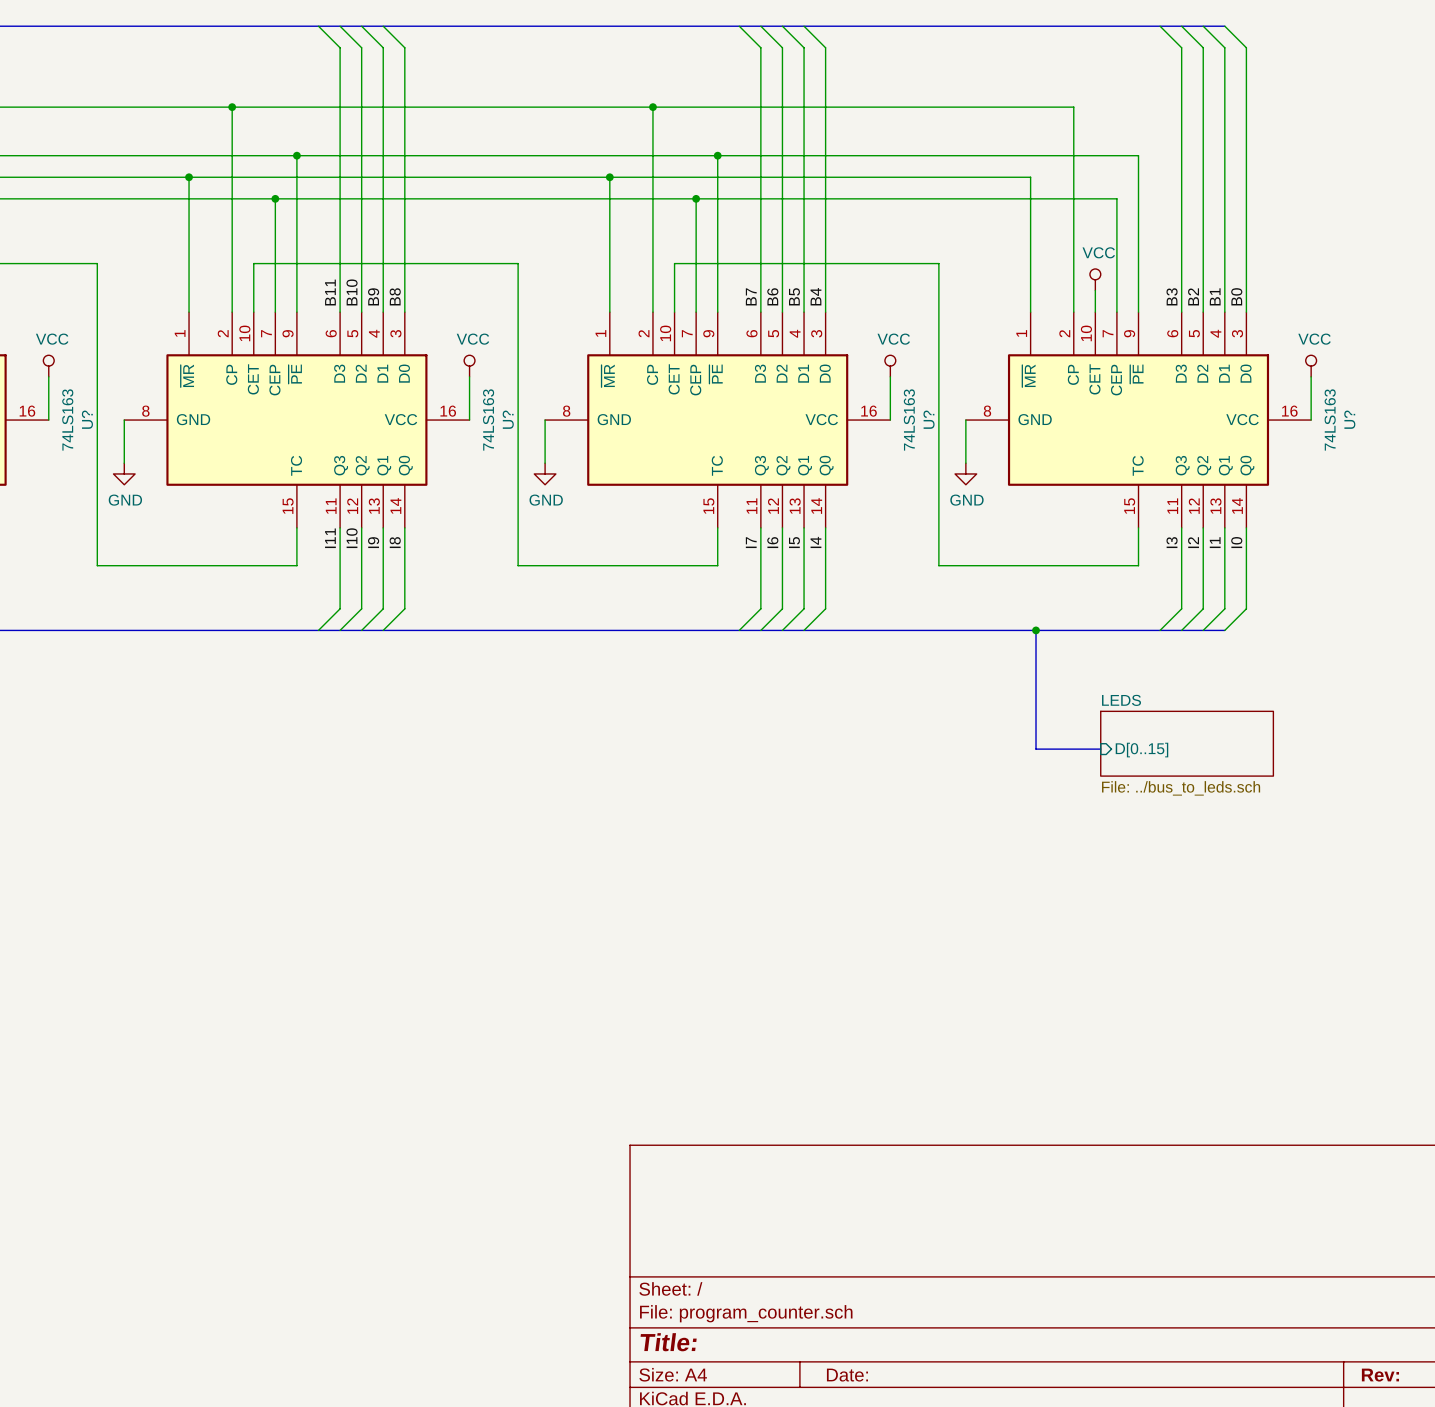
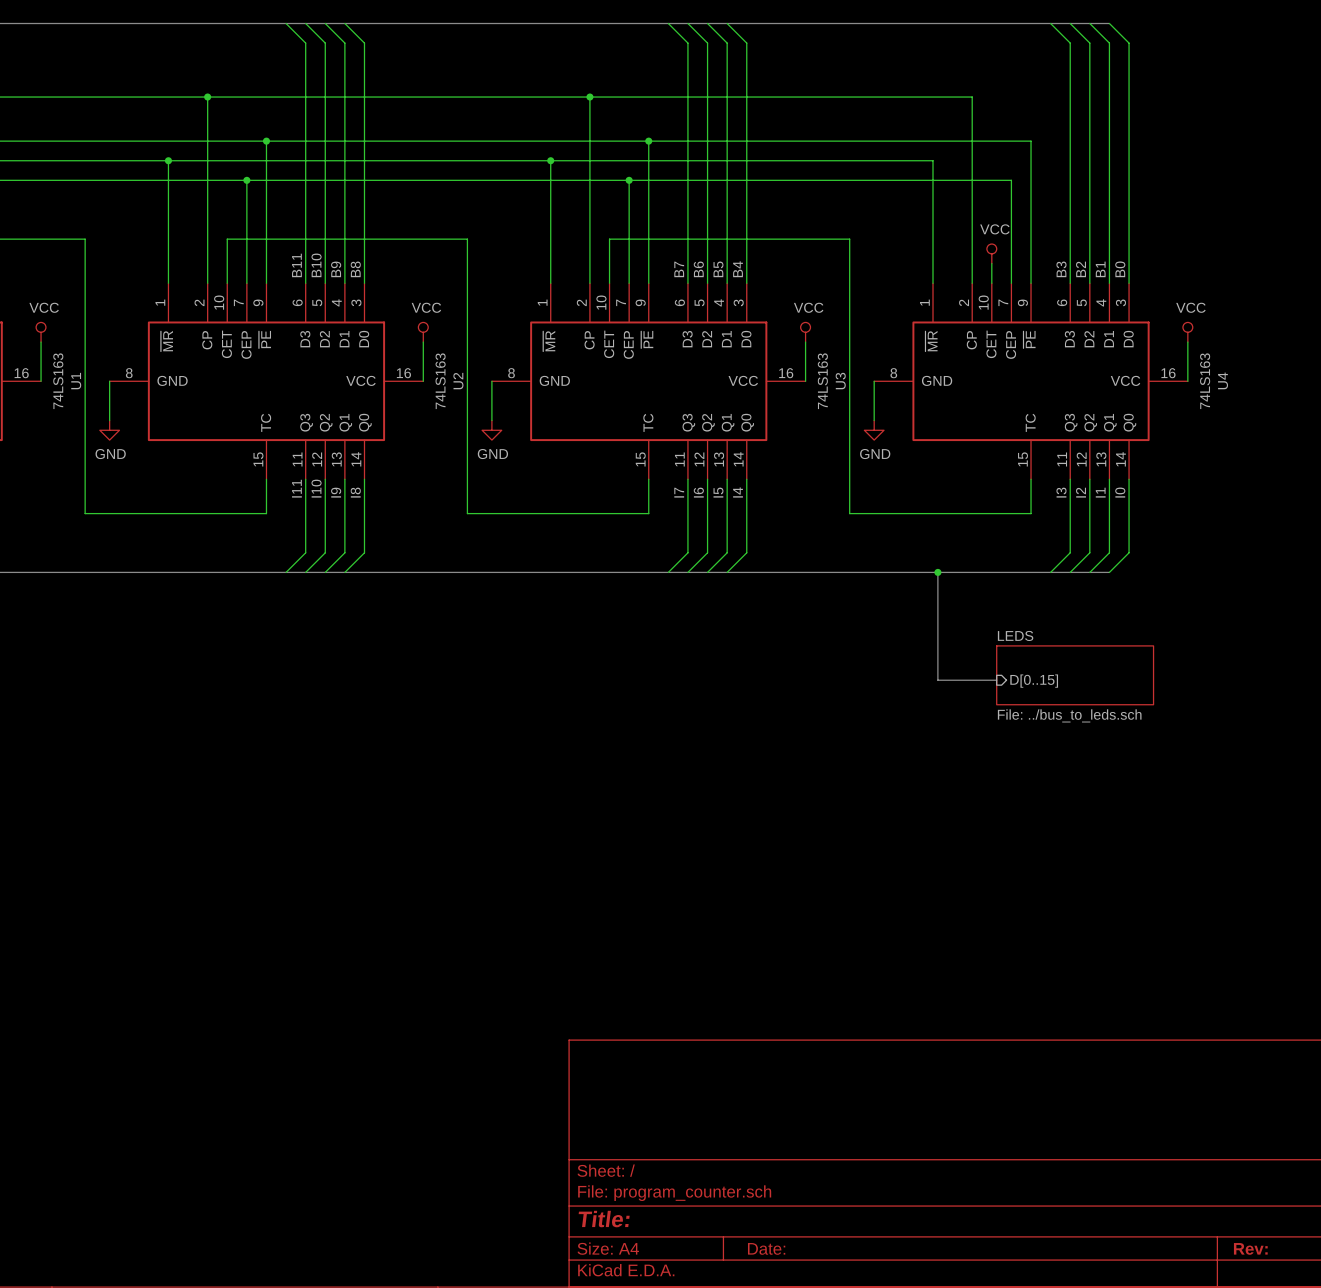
U? name: U? (87, 419) -> U1 (76, 381)
U? name: U? (508, 419) -> U2 (458, 381)
U? name: U? (929, 419) -> U3 (840, 381)
U? name: U? (1349, 419) -> U4 (1223, 380)

